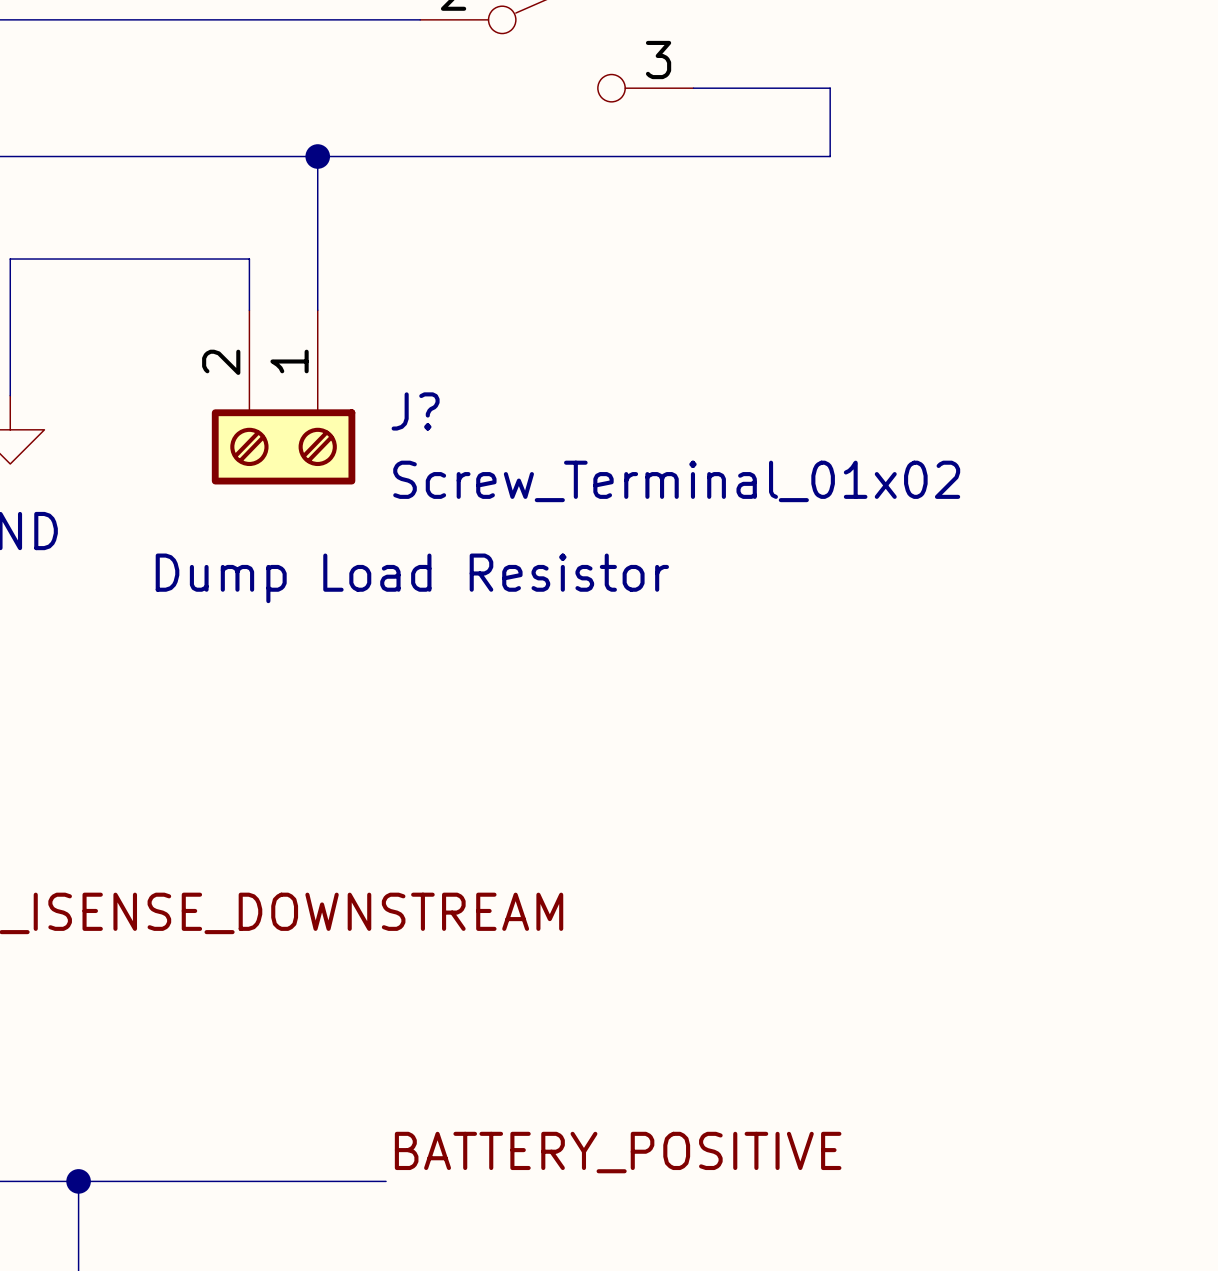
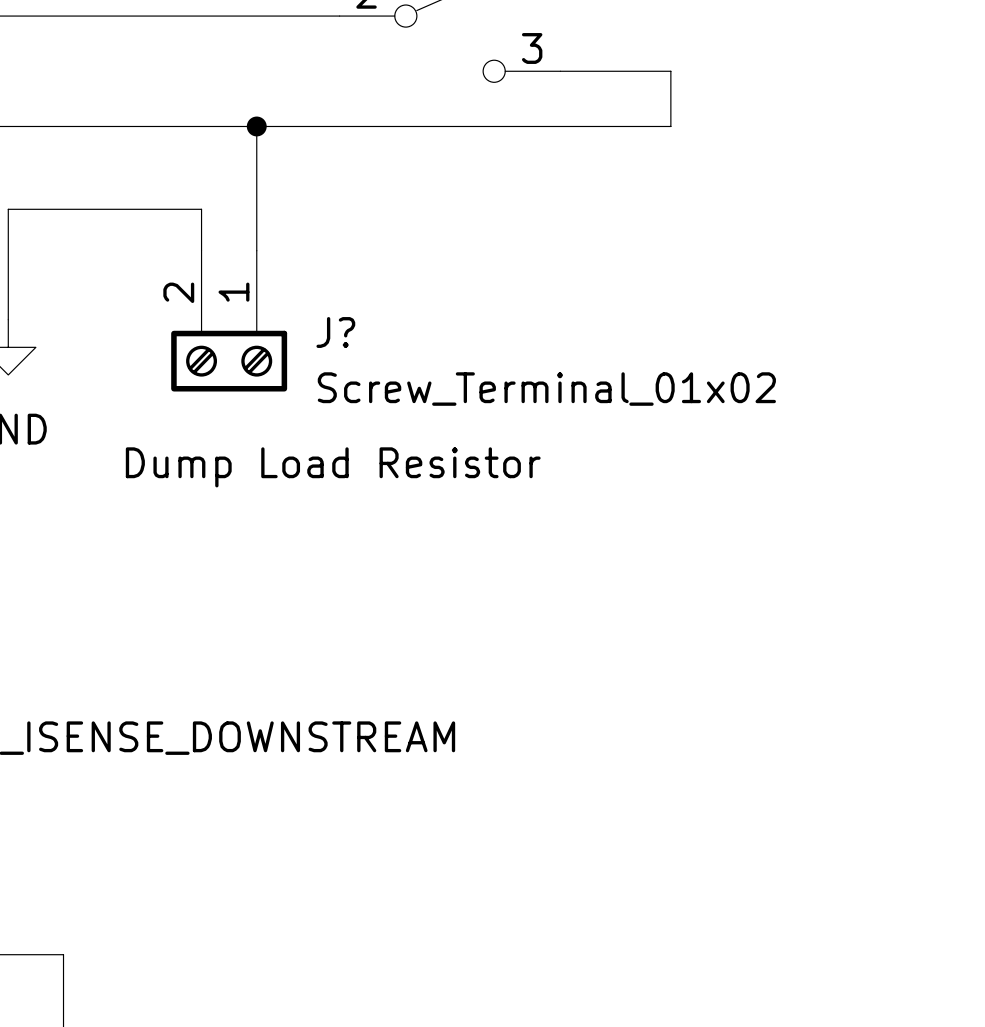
label: BATTERY_POSITIVE (618, 1152) -> none
wire: (78, 1181) (386, 1181) -> none
junction: (78, 1181) -> none

